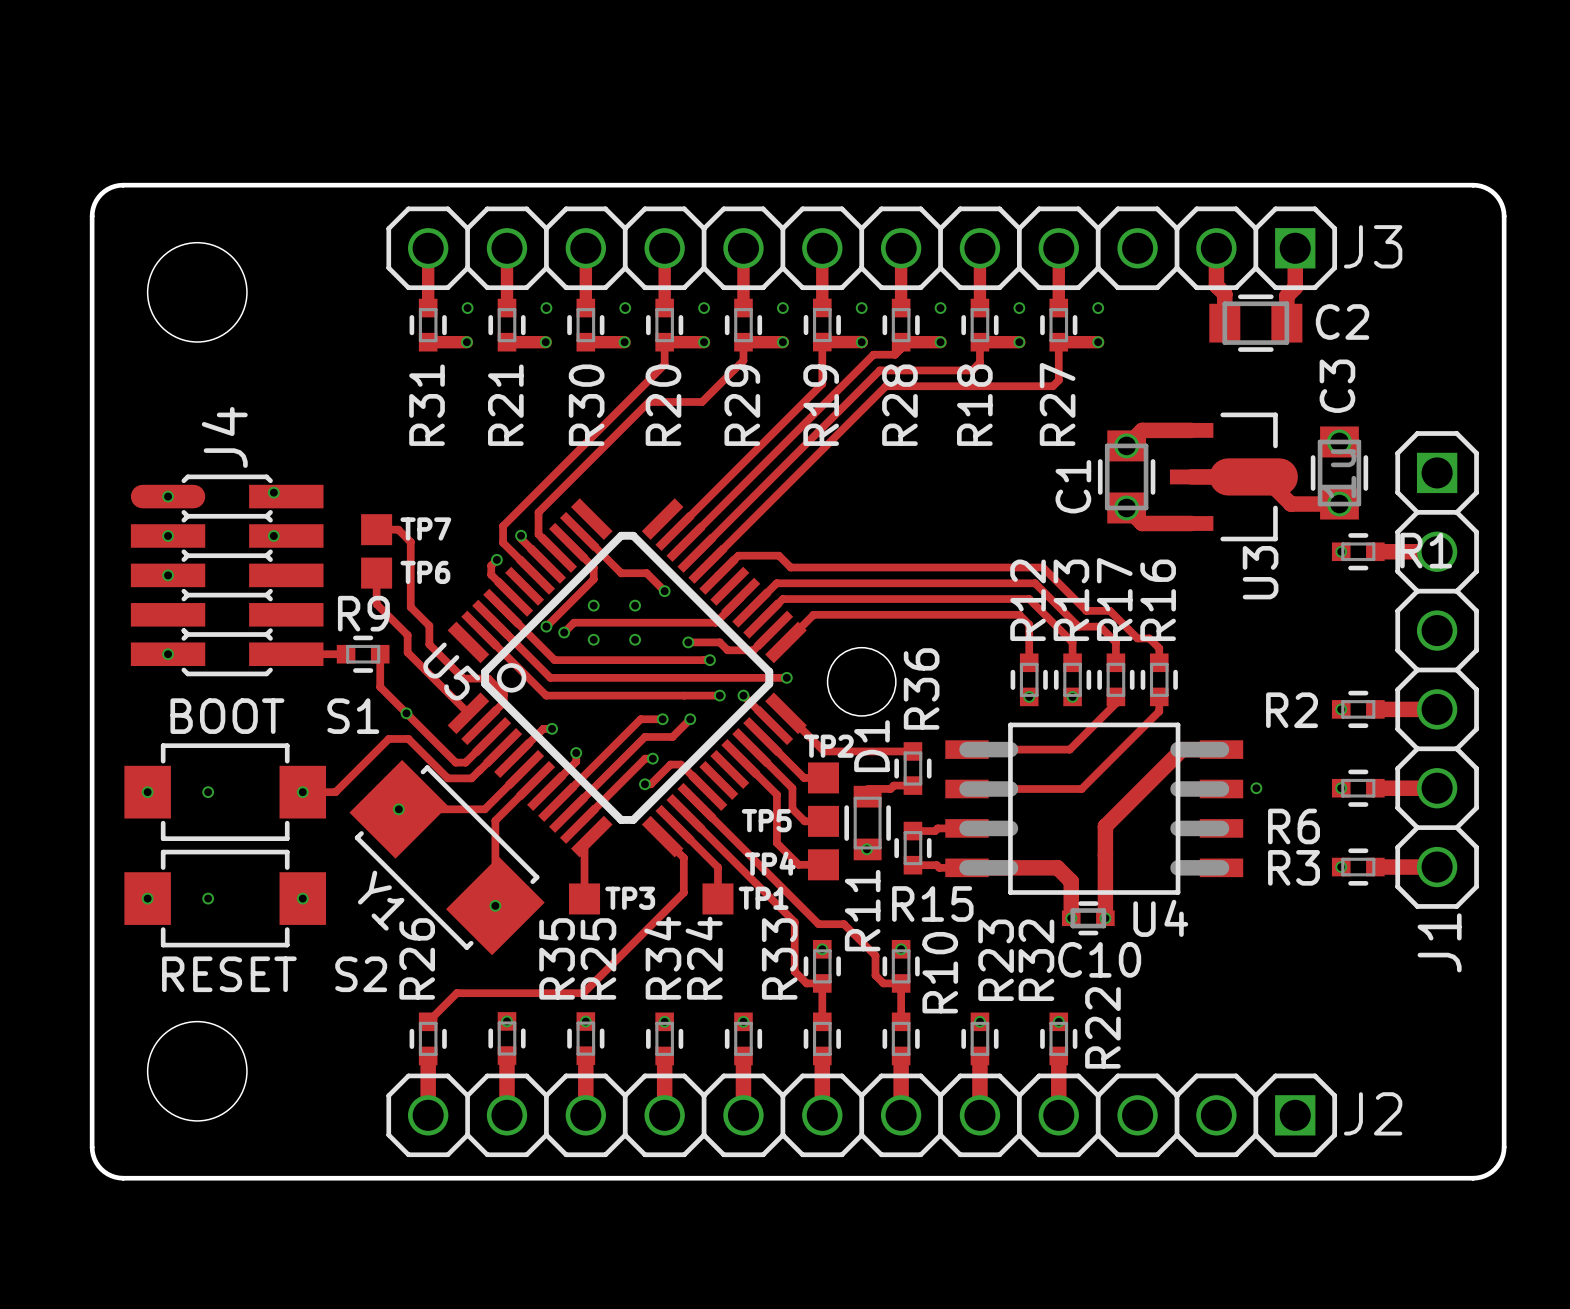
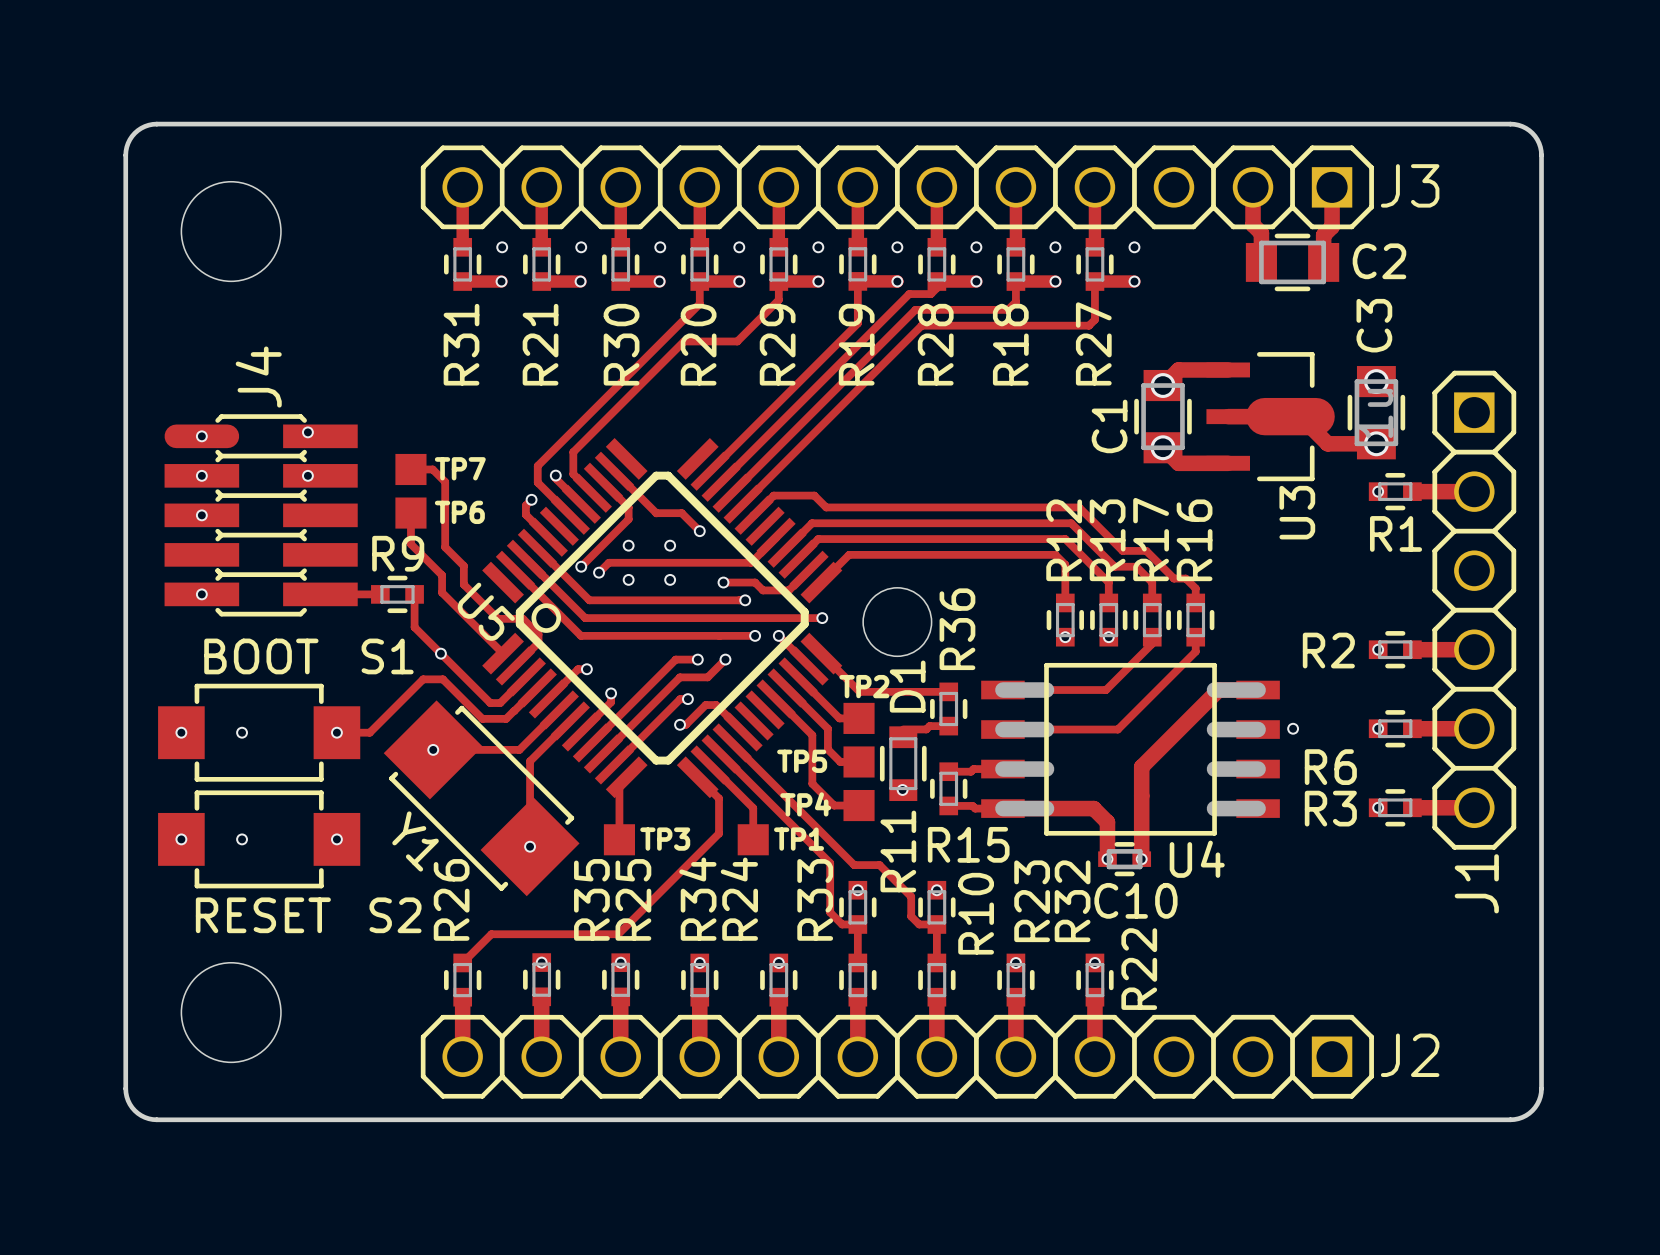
R1 name position: R1 (1426, 550) -> R1 (1396, 533)

